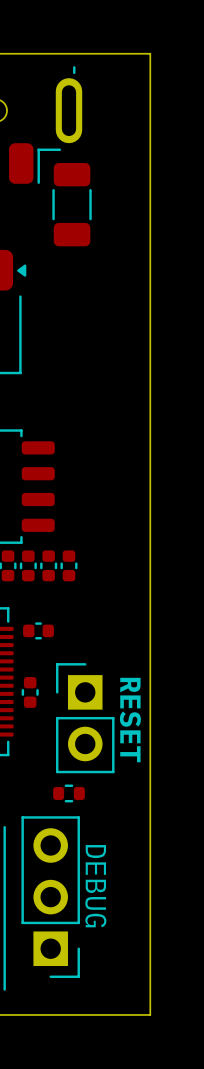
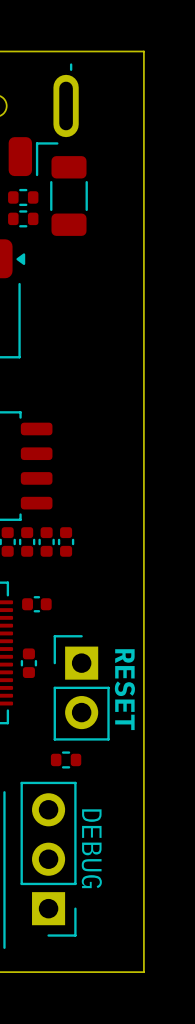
part: none -> (23, 197)
part: none -> (23, 218)

